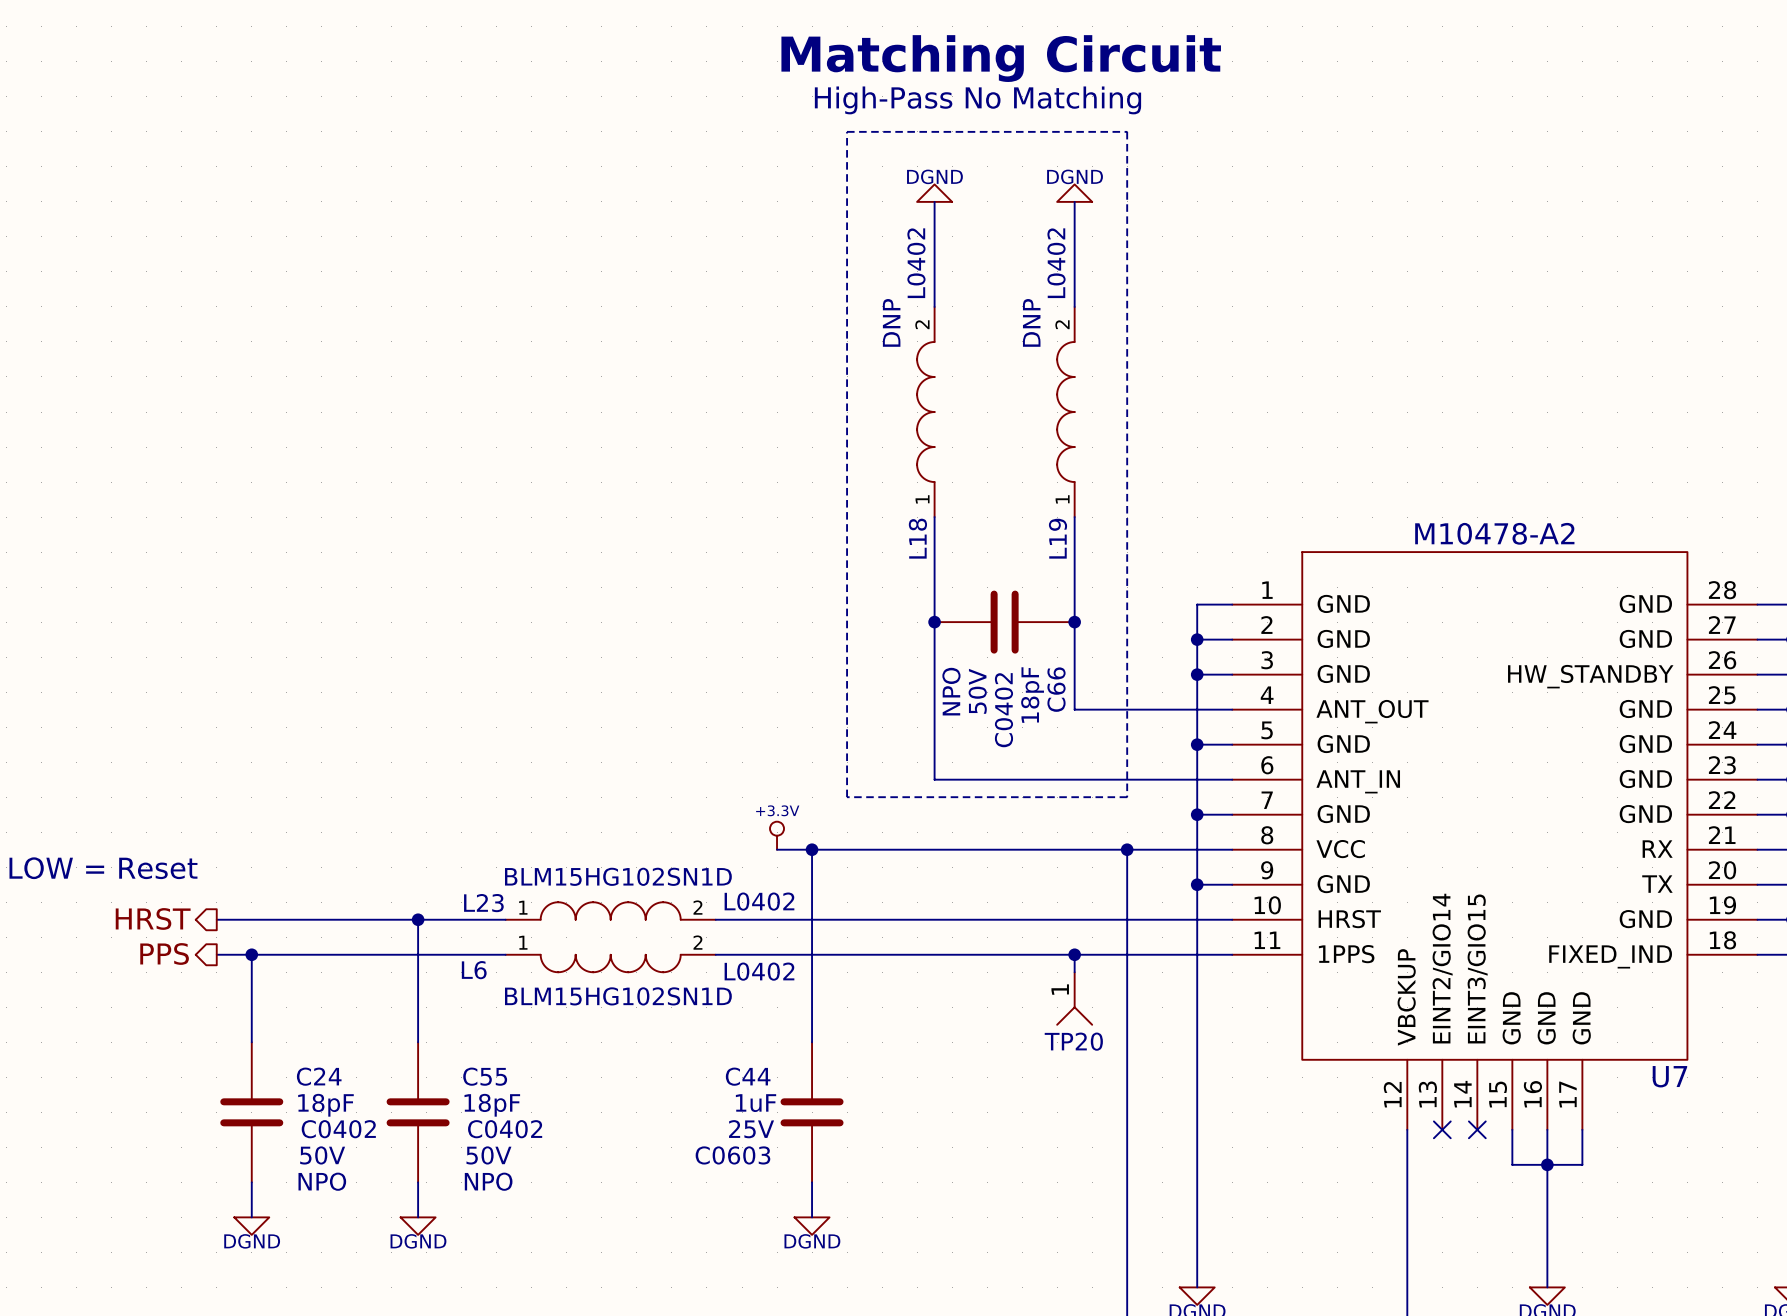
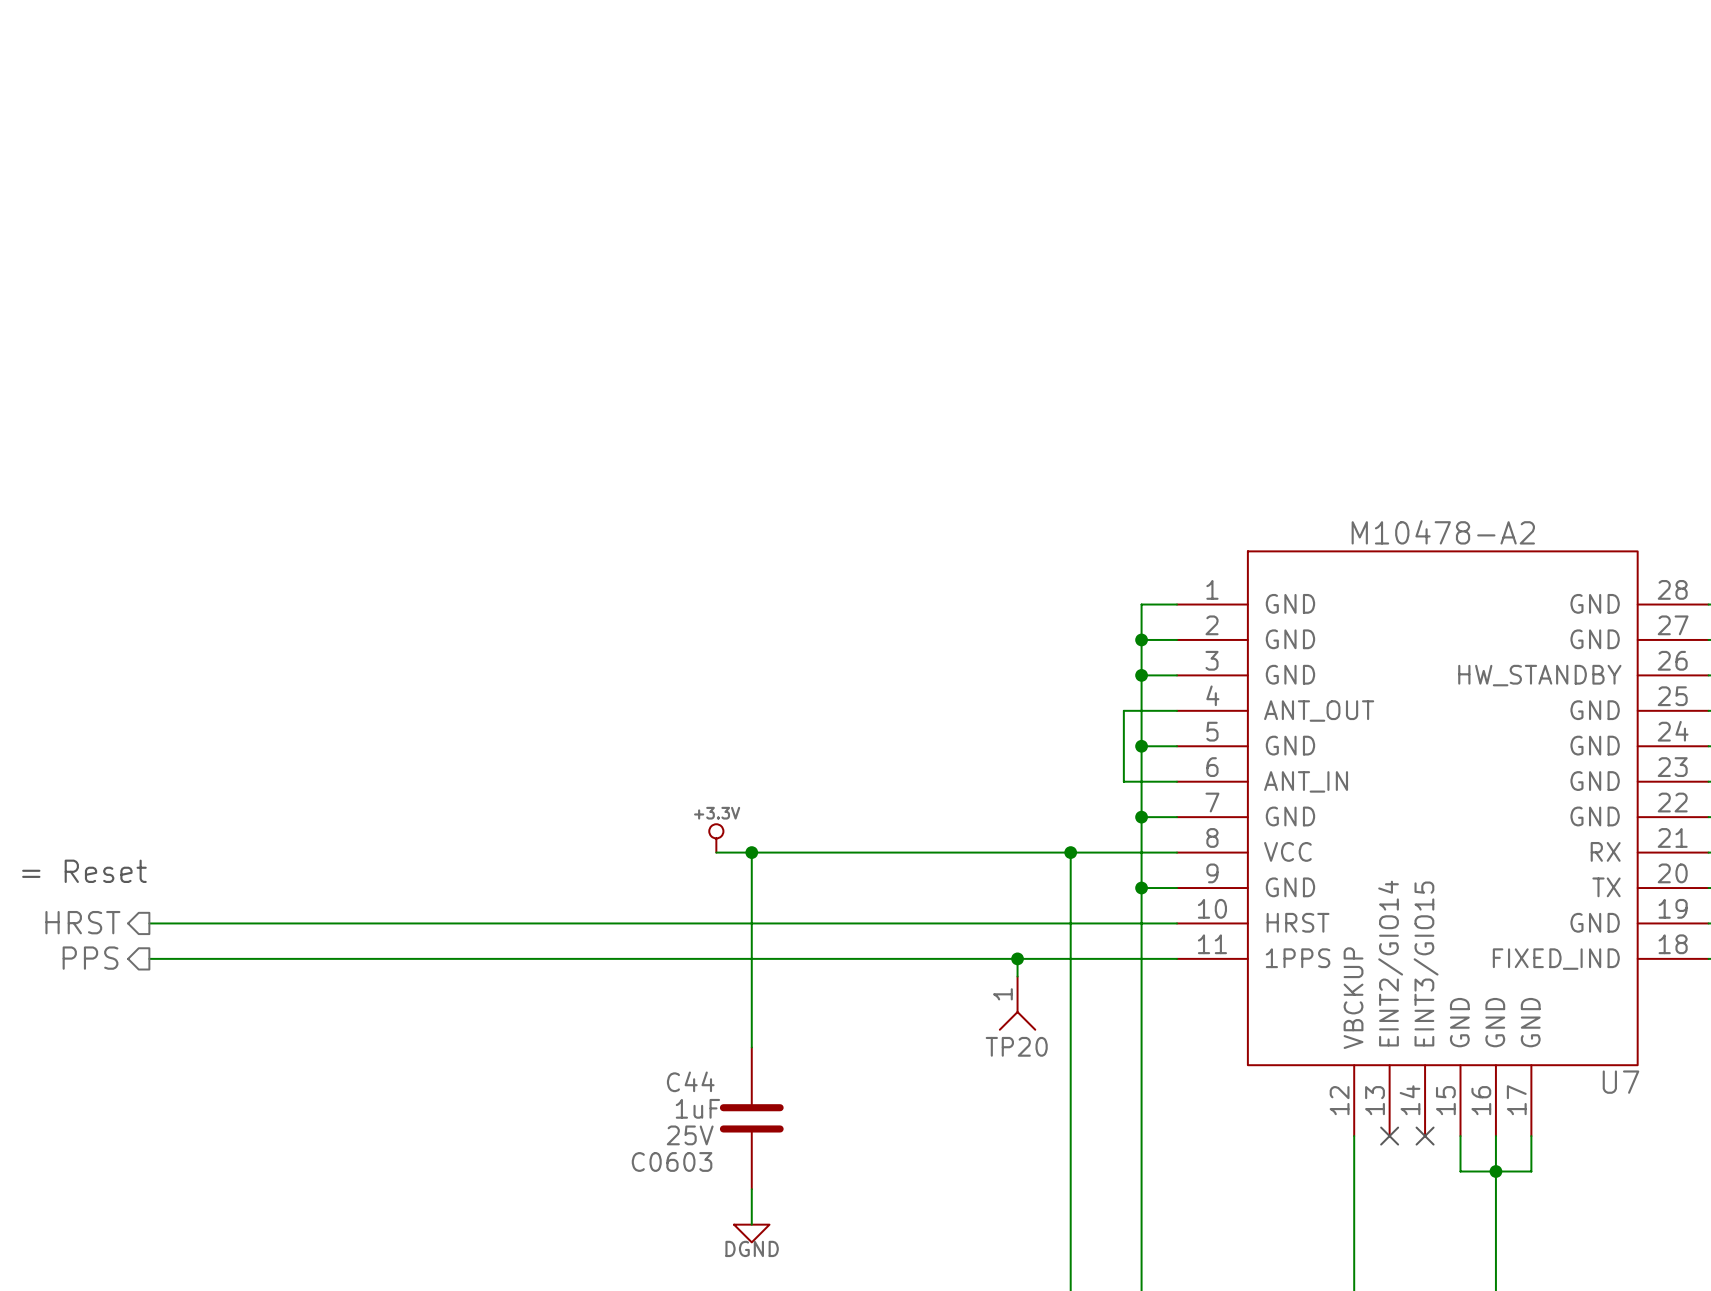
text: Matching Circuit (1001, 58) -> none
text: High-Pass No Matching (977, 100) -> none
line: (847, 131) (847, 797) (1127, 797) (1127, 131) (847, 131) -> none
power symbol: DGND (934, 193) -> none
power symbol: DGND (1074, 193) -> none
wire: (934, 201) (934, 306) -> none
wire: (1074, 201) (1074, 306) -> none
L18: DNP (925, 412) -> none
L19: DNP (1065, 412) -> none
wire: (934, 517) (934, 779) (1179, 779) -> none
wire: (1074, 517) (1074, 709) (1179, 709) -> (1123, 781) (1123, 710)
junction: (934, 622) -> none
C66: 18pF (1004, 622) -> none
junction: (1074, 622) -> none
L23: BLM15HG102SN1D (610, 910) -> none
wire: (418, 919) (418, 1042) -> none
junction: (418, 919) -> none
wire: none -> (441, 923) (654, 923)
wire: (251, 954) (251, 1042) -> none
junction: (251, 954) -> none
wire: none -> (441, 958) (654, 958)
L6: BLM15HG102SN1D (610, 963) -> none
C24: 18pF (251, 1112) -> none
C55: 18pF (418, 1112) -> none
wire: (251, 1182) (251, 1217) -> none
wire: (418, 1182) (418, 1217) -> none
power symbol: DGND (251, 1226) -> none
power symbol: DGND (418, 1226) -> none

